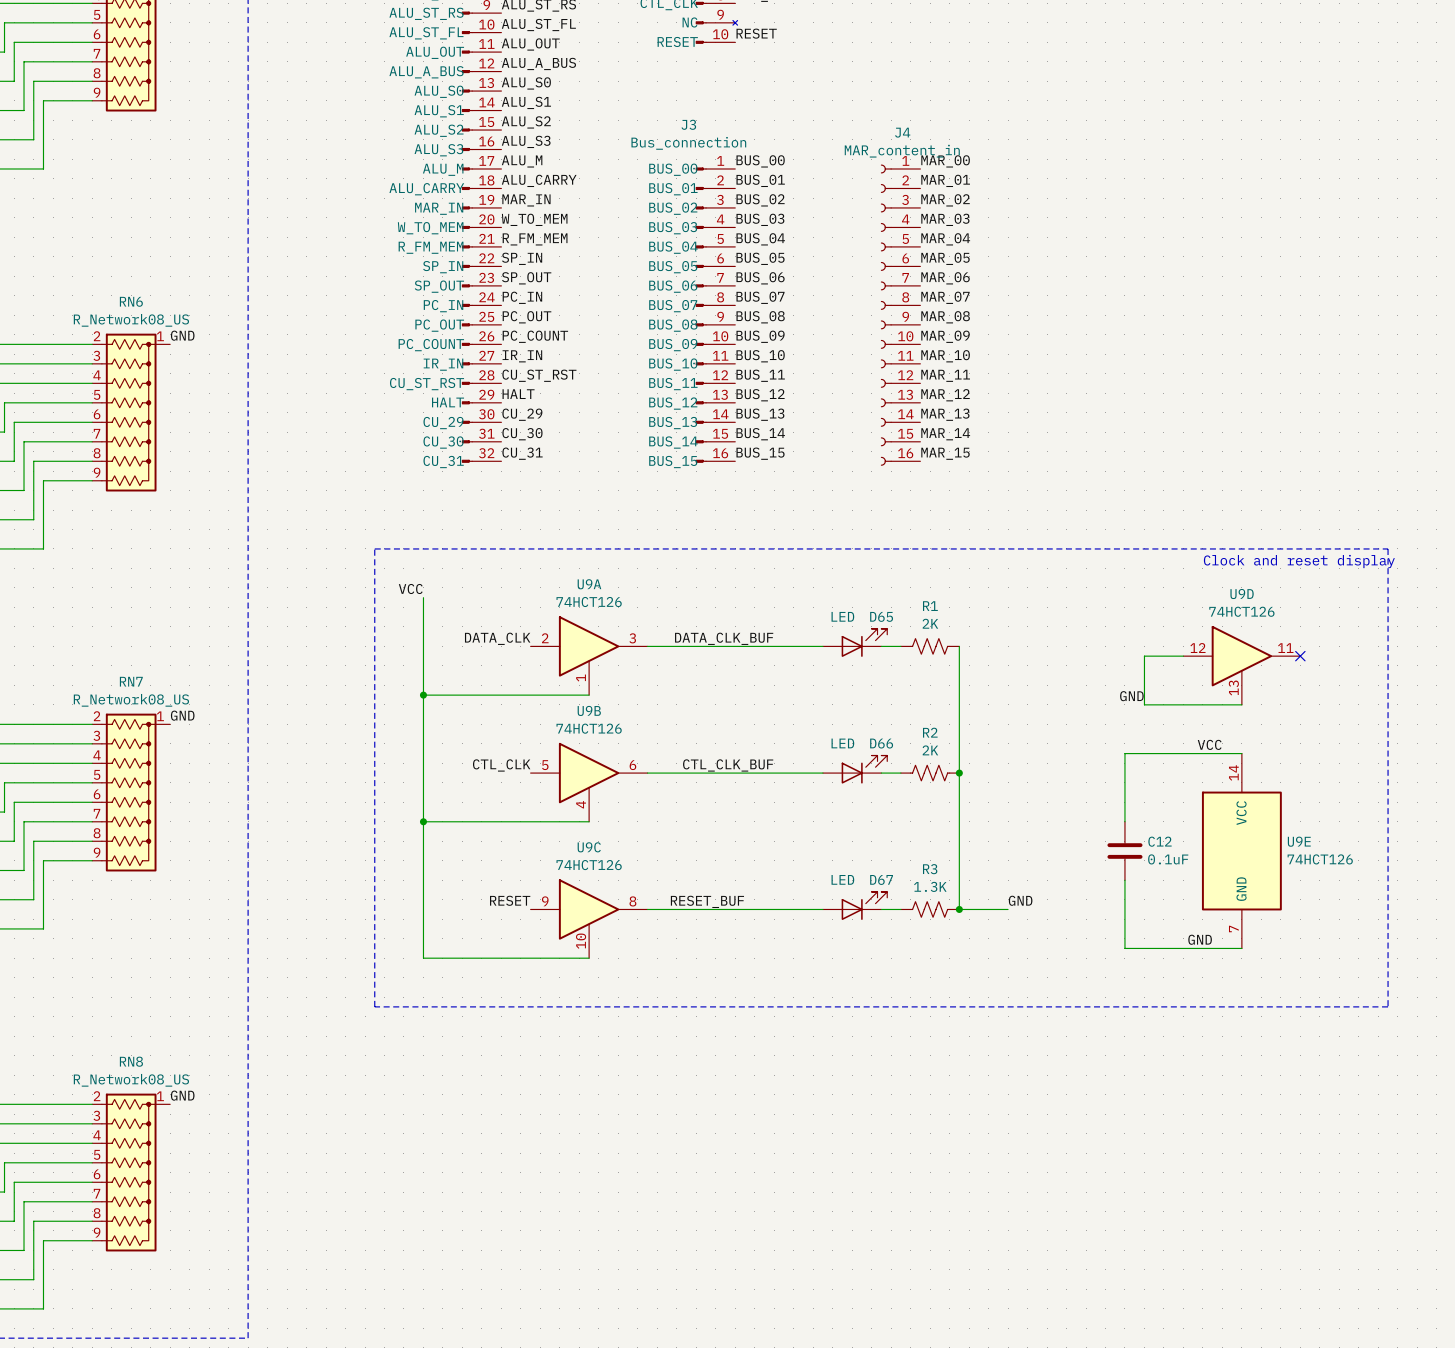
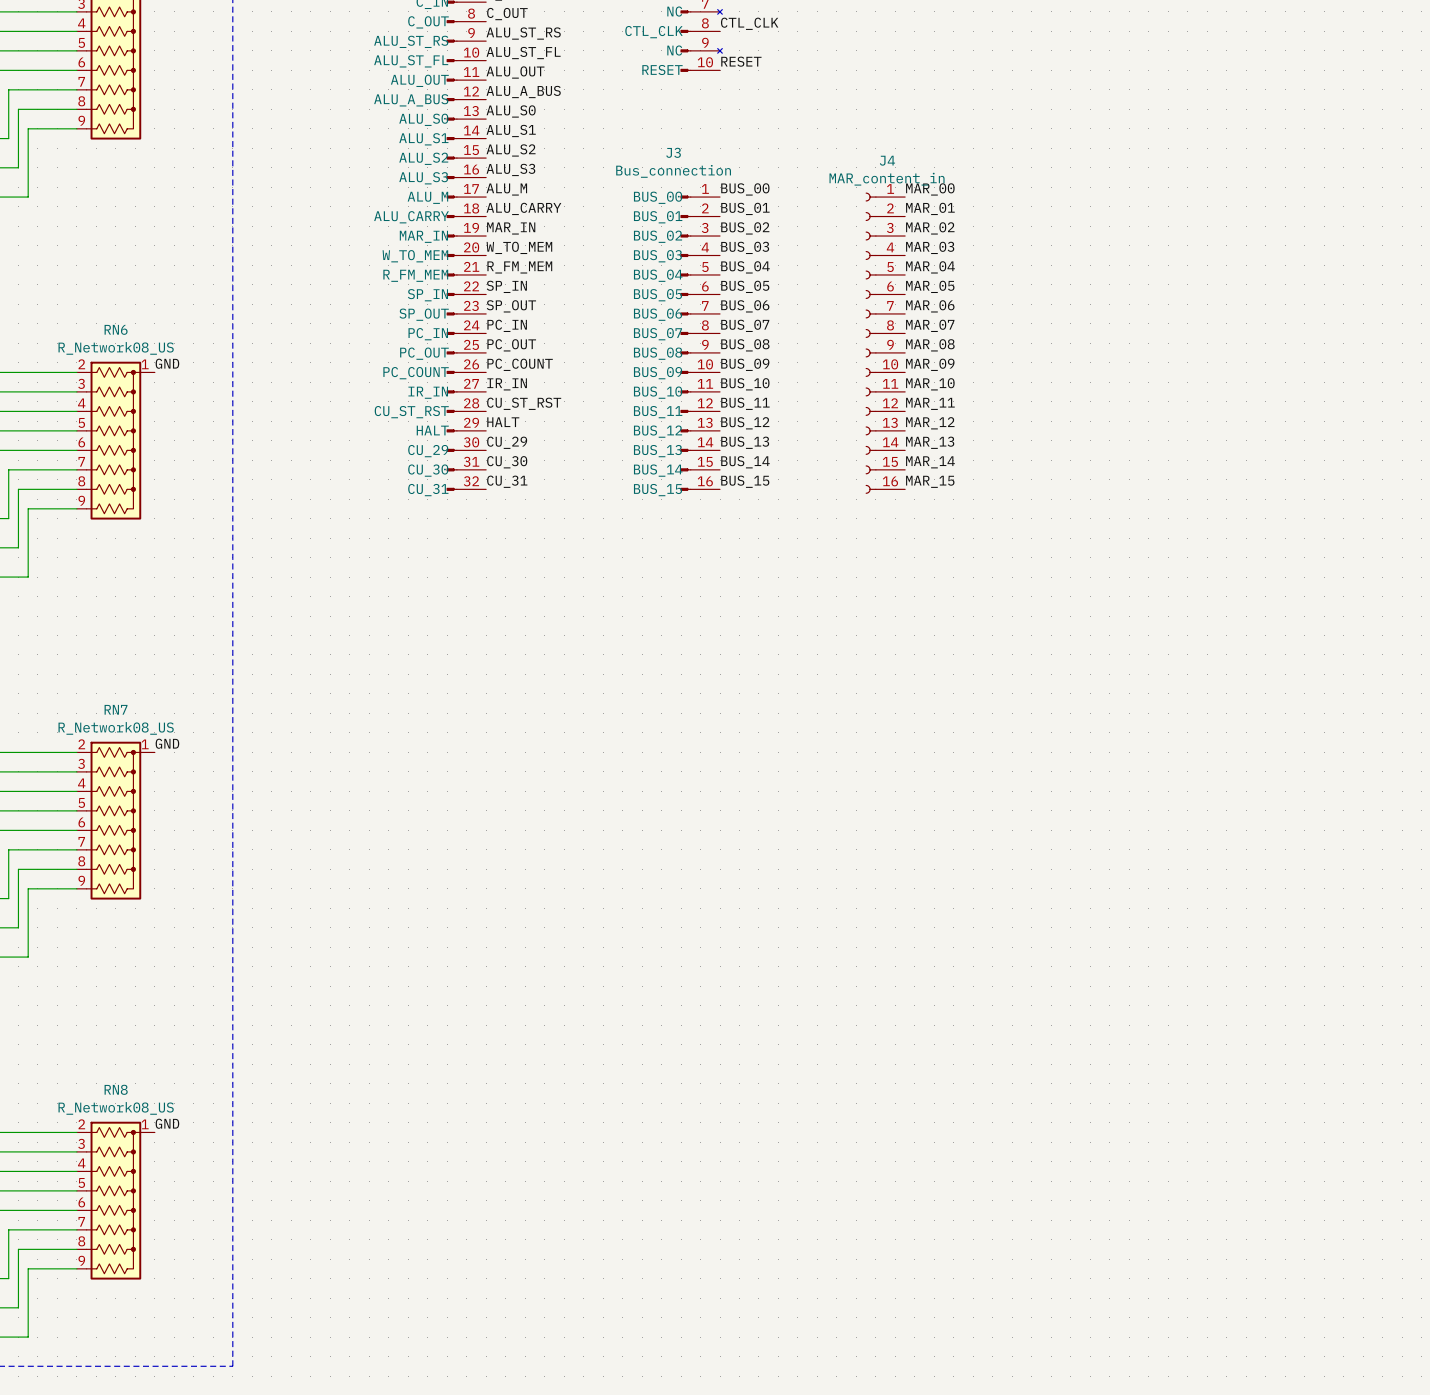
line: (374, 548) (1388, 548) (1388, 1006) (374, 1006) (374, 548) -> none
text: Clock and reset display (1299, 561) -> none
label: VCC (410, 588) -> none
wire: (423, 597) (423, 958) (589, 958) -> none
label: DATA_CLK (497, 638) -> none
label: DATA_CLK_BUF (724, 638) -> none
D65: LED (855, 642) -> none
wire: (647, 646) (822, 646) -> none
wire: (881, 646) (900, 646) -> none
R1: 2K (930, 646) -> none
wire: (959, 646) (959, 909) (1008, 909) -> none
U9A: 74HCT126 (589, 655) -> none
wire: (1183, 656) (1144, 656) (1144, 704) (1241, 704) -> none
no-connect mark: (1300, 656) -> none
U9D: 74HCT126 (1241, 665) -> none
wire: (423, 695) (589, 695) -> none
junction: (423, 695) -> none
label: GND (1131, 696) -> none
label: VCC (1209, 744) -> none
wire: (1241, 753) (1124, 753) (1124, 821) -> none
label: CTL_CLK (501, 765) -> none
label: CTL_CLK_BUF (728, 765) -> none
D66: LED (855, 769) -> none
wire: (647, 773) (822, 773) -> none
wire: (881, 773) (900, 773) -> none
R2: 2K (930, 773) -> none
junction: (959, 773) -> none
U9B: 74HCT126 (589, 782) -> none
wire: (423, 821) (589, 821) -> none
junction: (423, 821) -> none
C12: 0.1uF (1124, 851) -> none
U9E: 74HCT126 (1241, 851) -> none
wire: (1124, 880) (1124, 948) (1241, 948) -> none
label: RESET (510, 900) -> none
label: GND (1020, 900) -> none
label: RESET_BUF (707, 901) -> none
D67: LED (855, 905) -> none
wire: (647, 909) (822, 909) -> none
wire: (881, 909) (900, 909) -> none
R3: 1.3K (930, 909) -> none
junction: (959, 909) -> none
U9C: 74HCT126 (589, 918) -> none
label: GND (1200, 939) -> none

